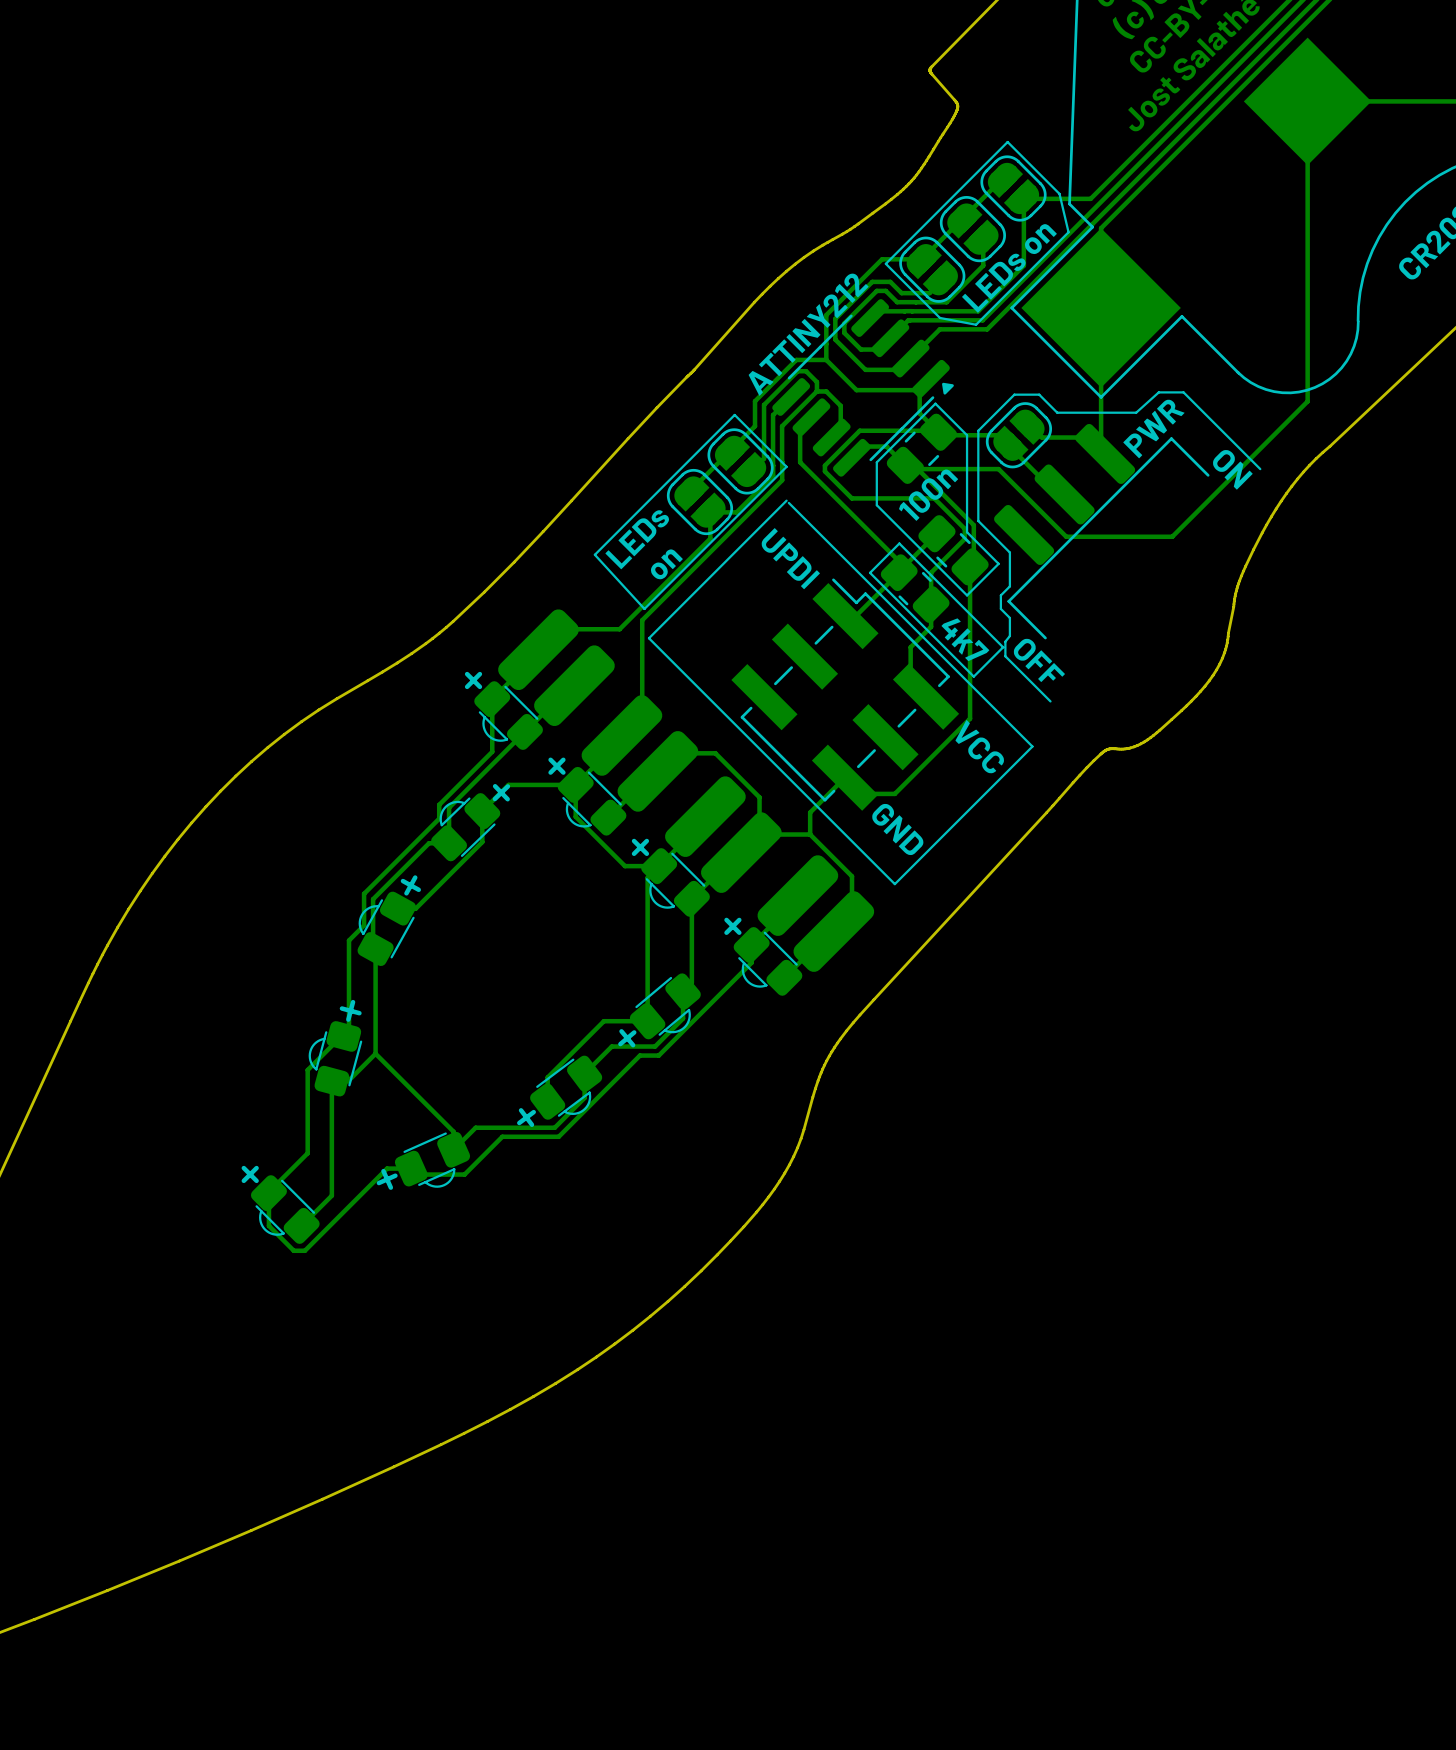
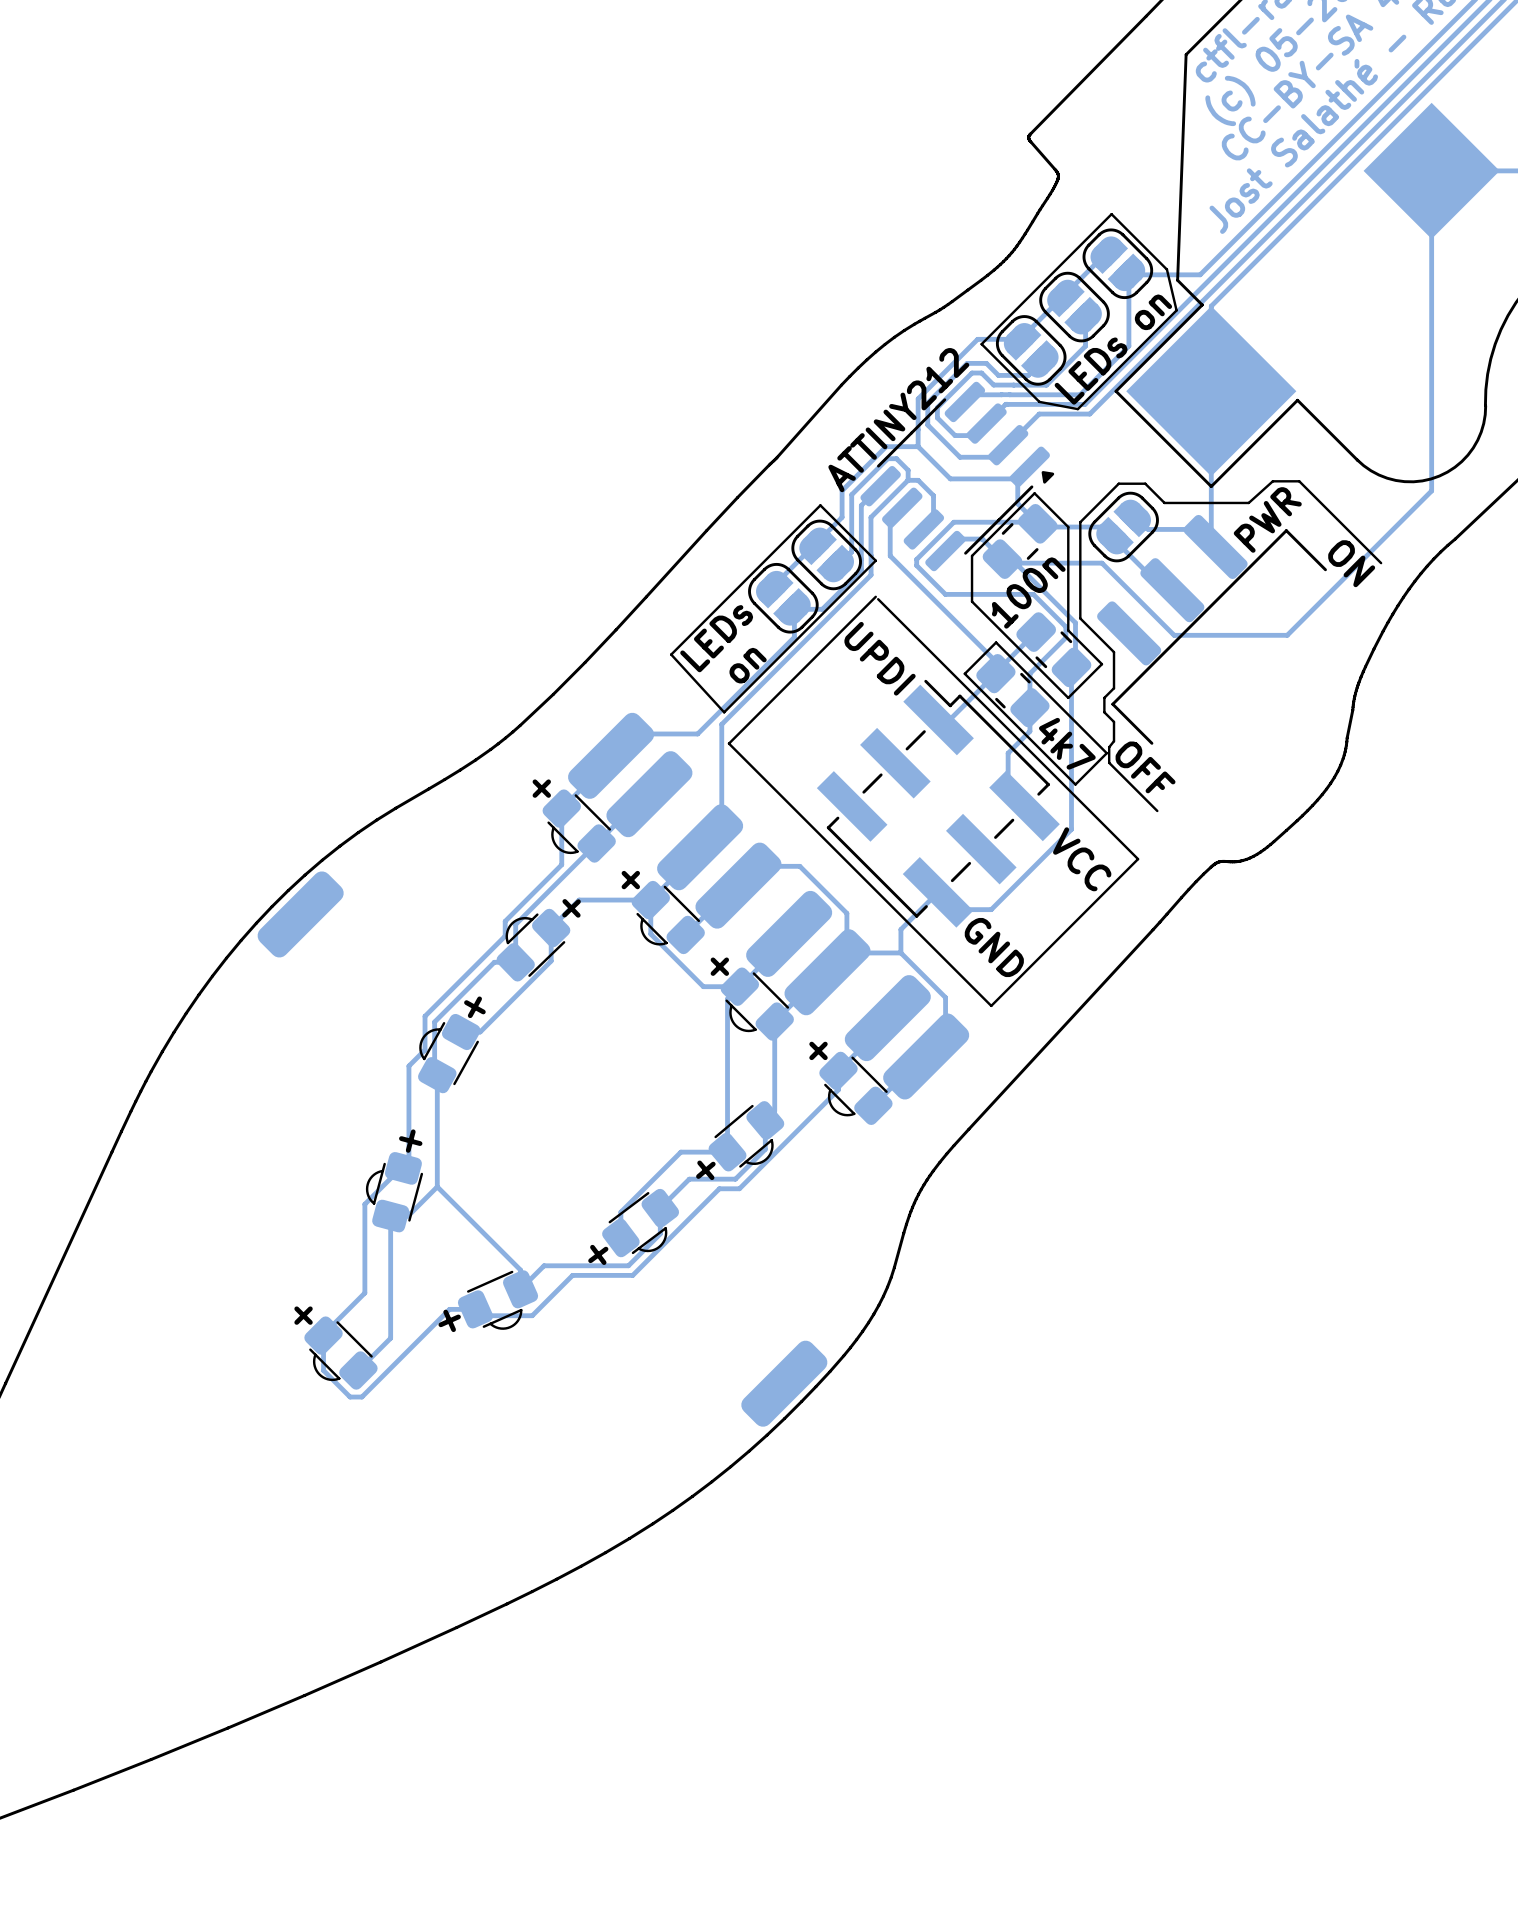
part: none -> (300, 914)
part: none -> (784, 1383)

